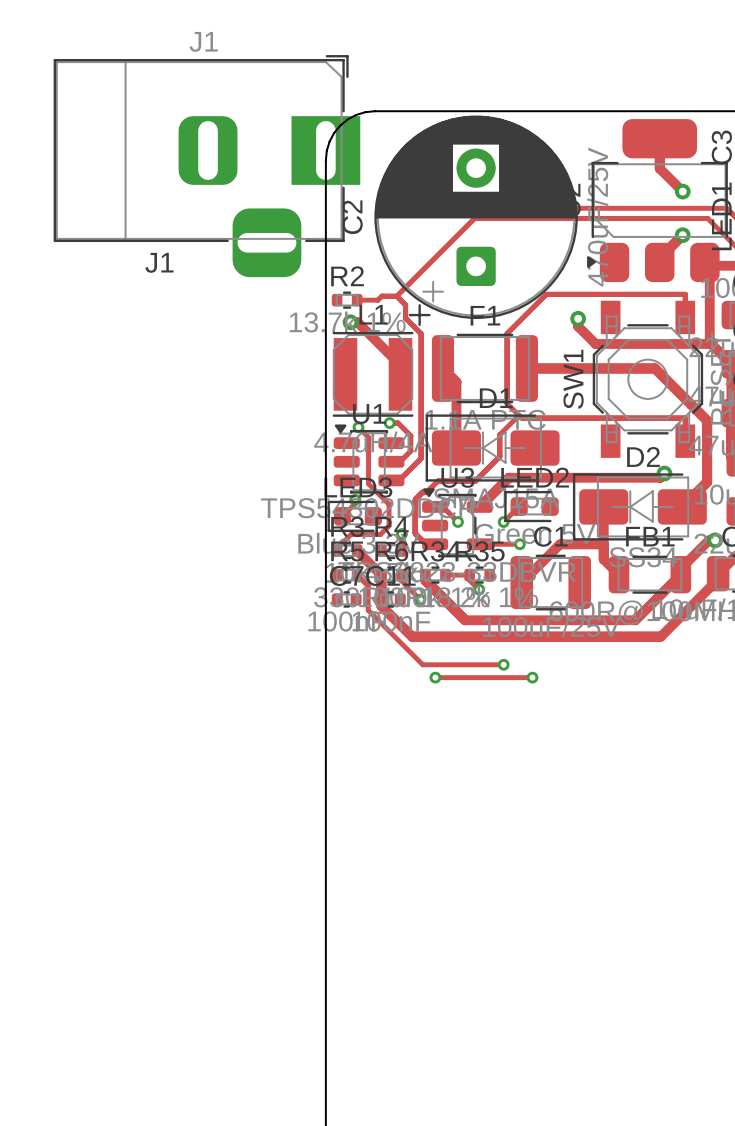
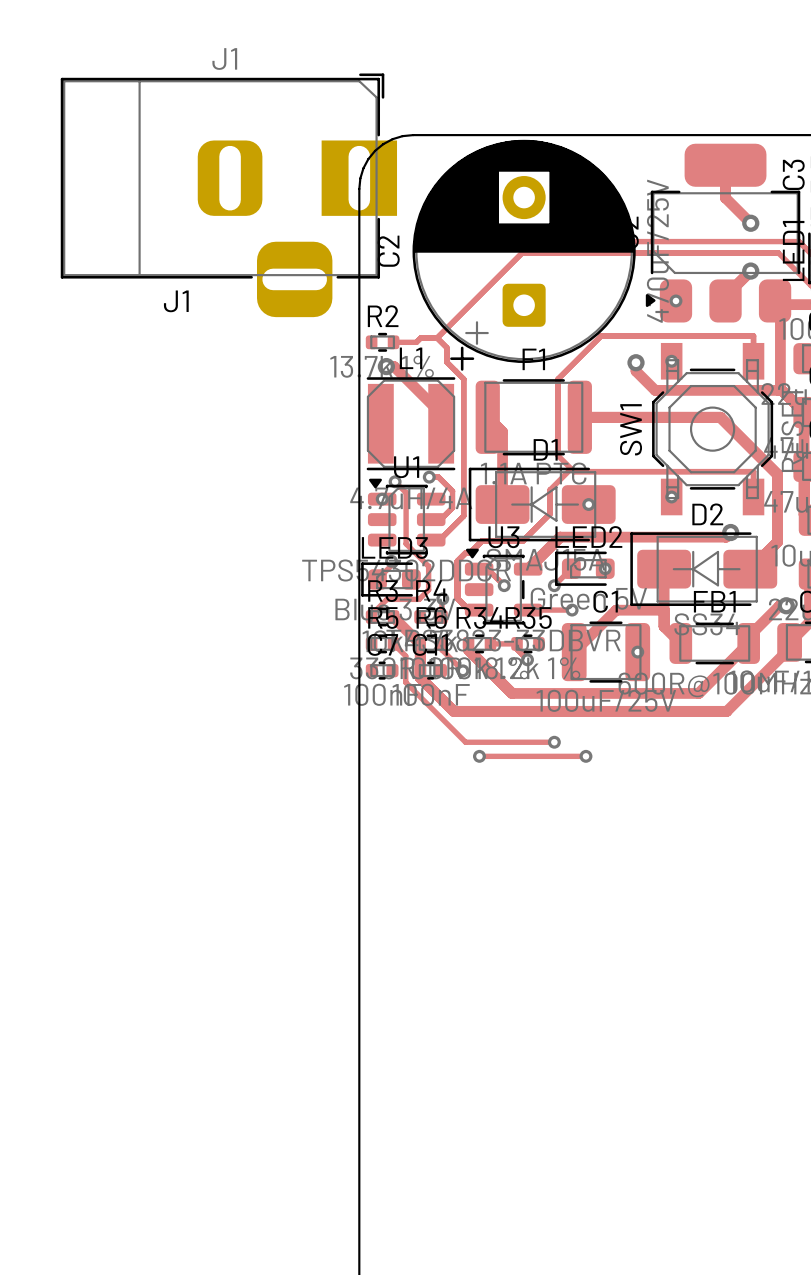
via: none -> (675, 300)
via: none -> (671, 361)
via: none -> (671, 496)
via: none -> (382, 499)
via: none -> (588, 504)
via: none -> (605, 568)
via: none -> (637, 652)

